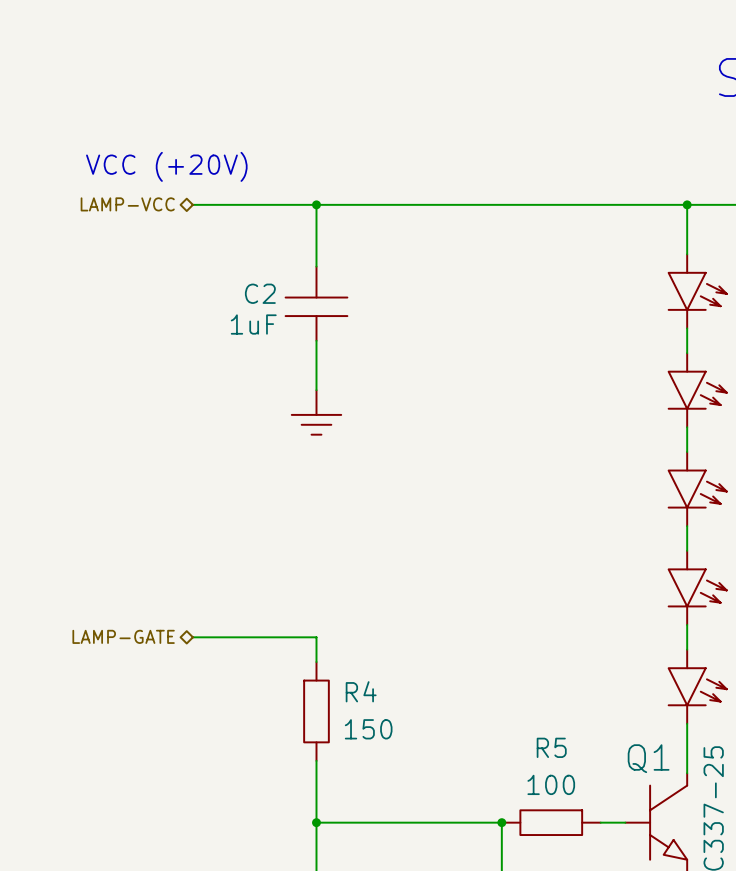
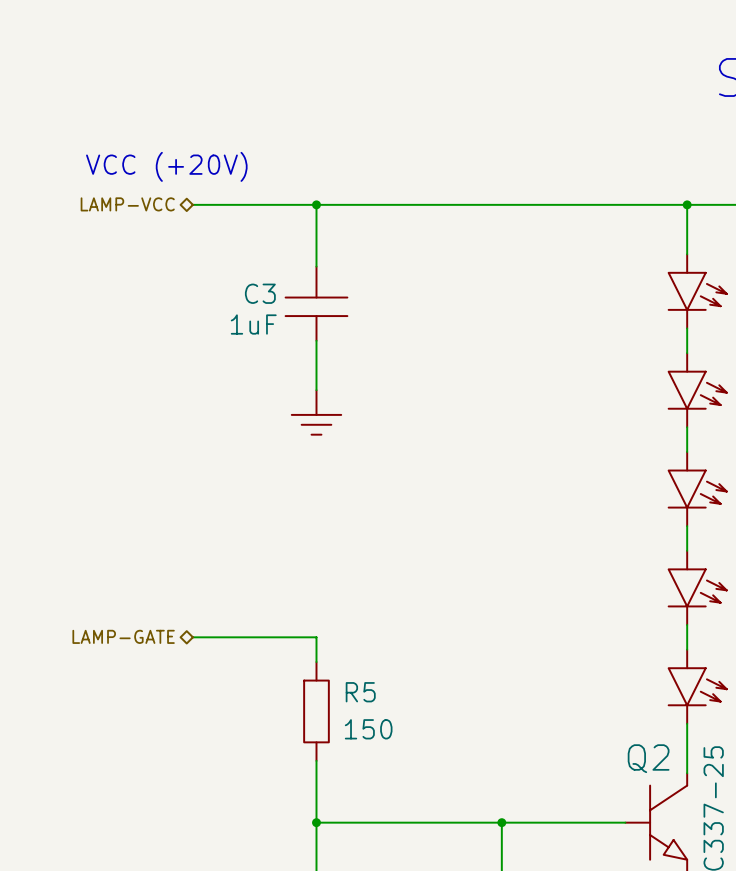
C2 name: C2 (260, 293) -> C3 (260, 293)
R4 name: R4 (361, 691) -> R5 (360, 692)
Q1 name: Q1 (648, 758) -> Q2 (648, 758)
wire: none -> (501, 822) (600, 822)
R5: 100 (551, 822) -> none

